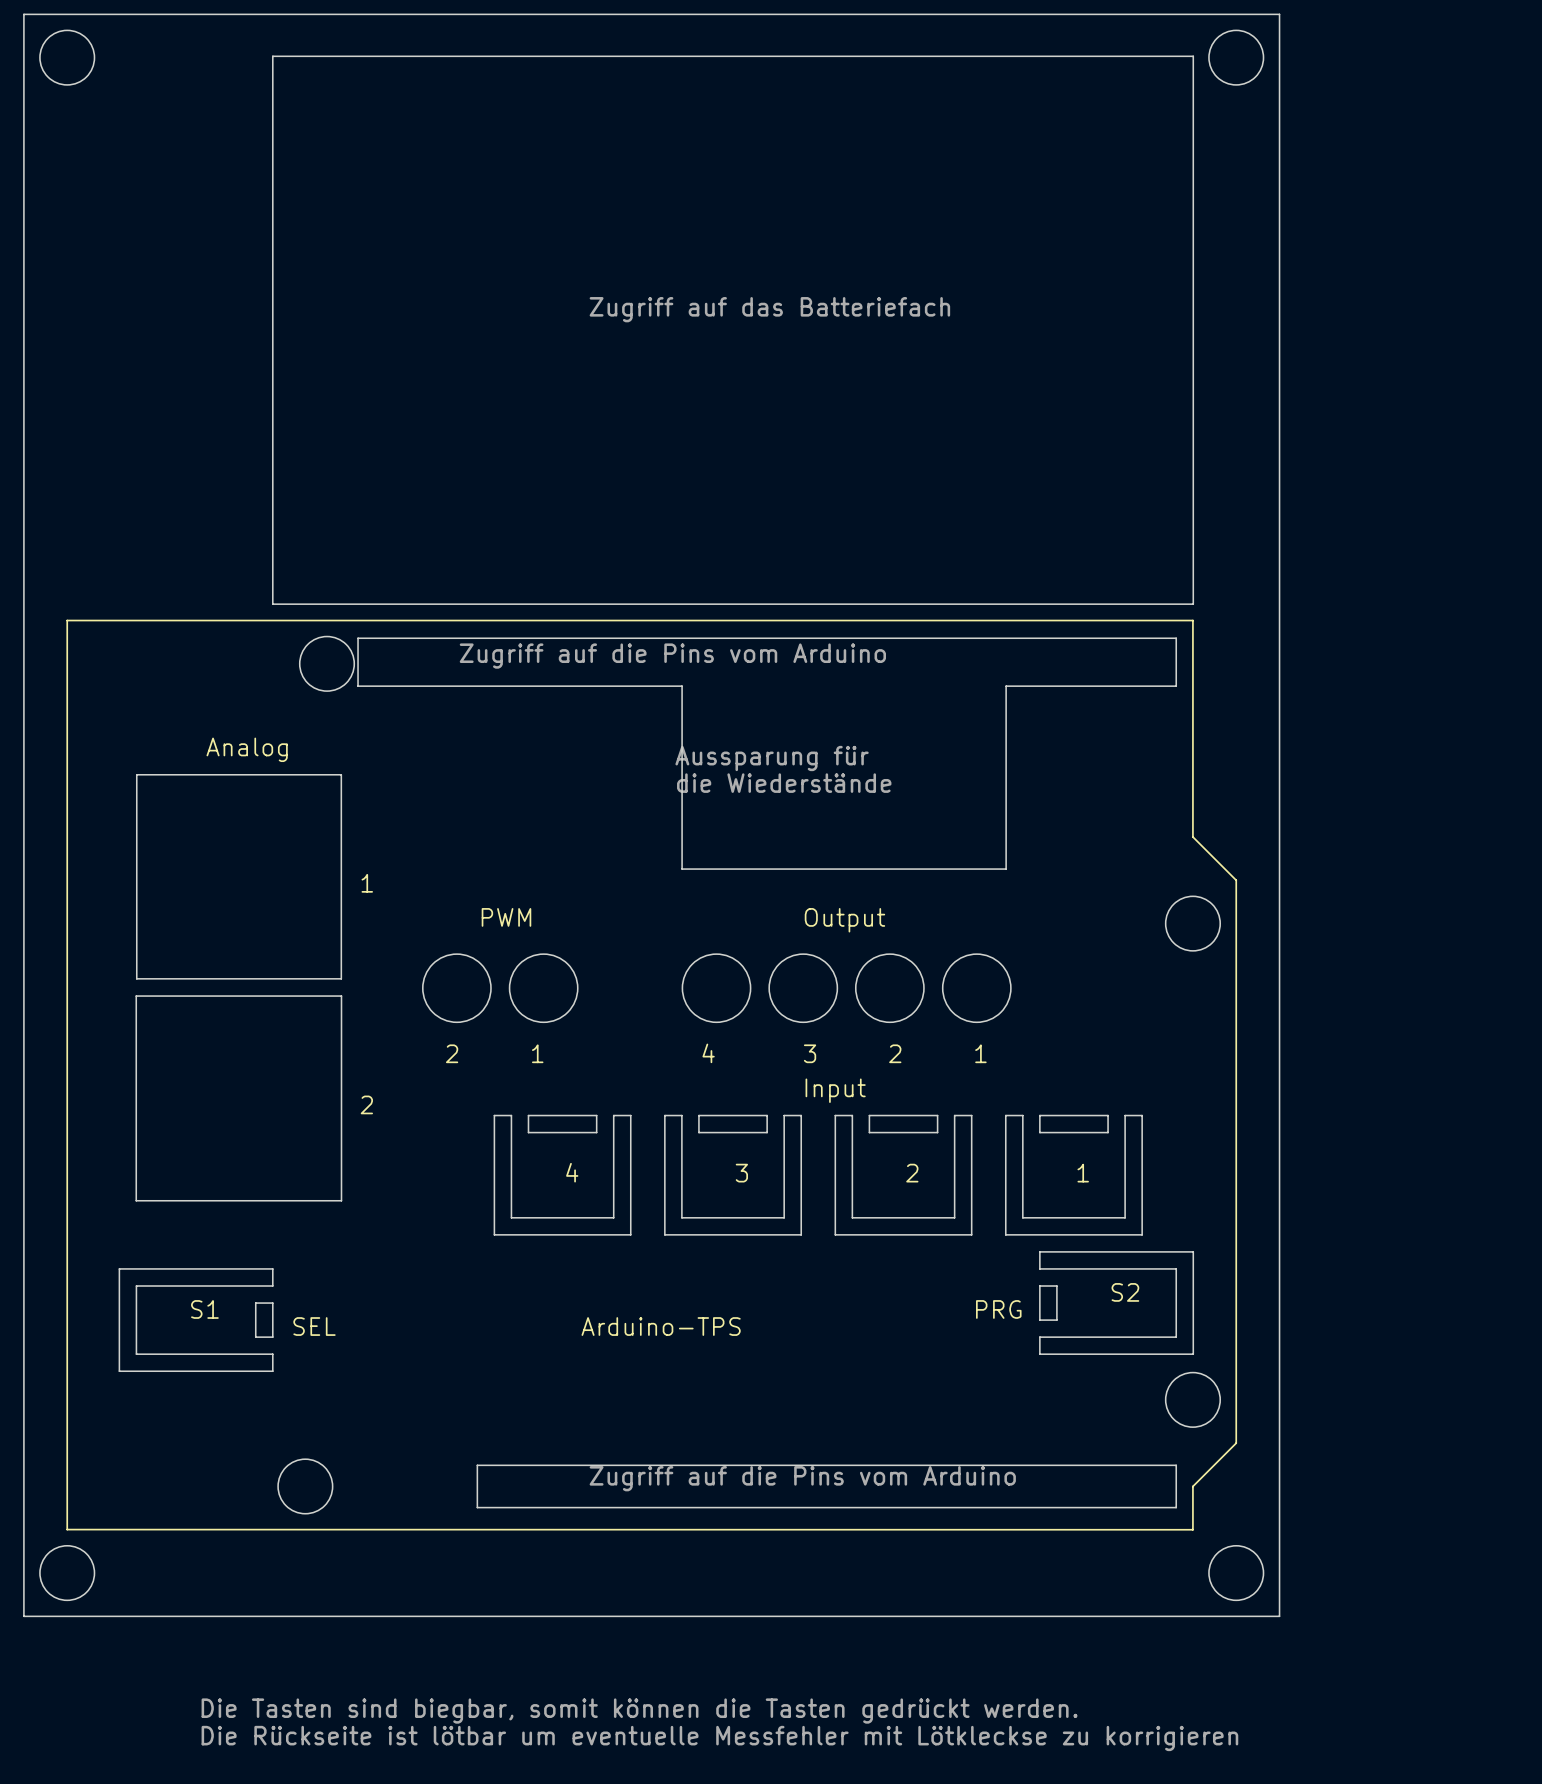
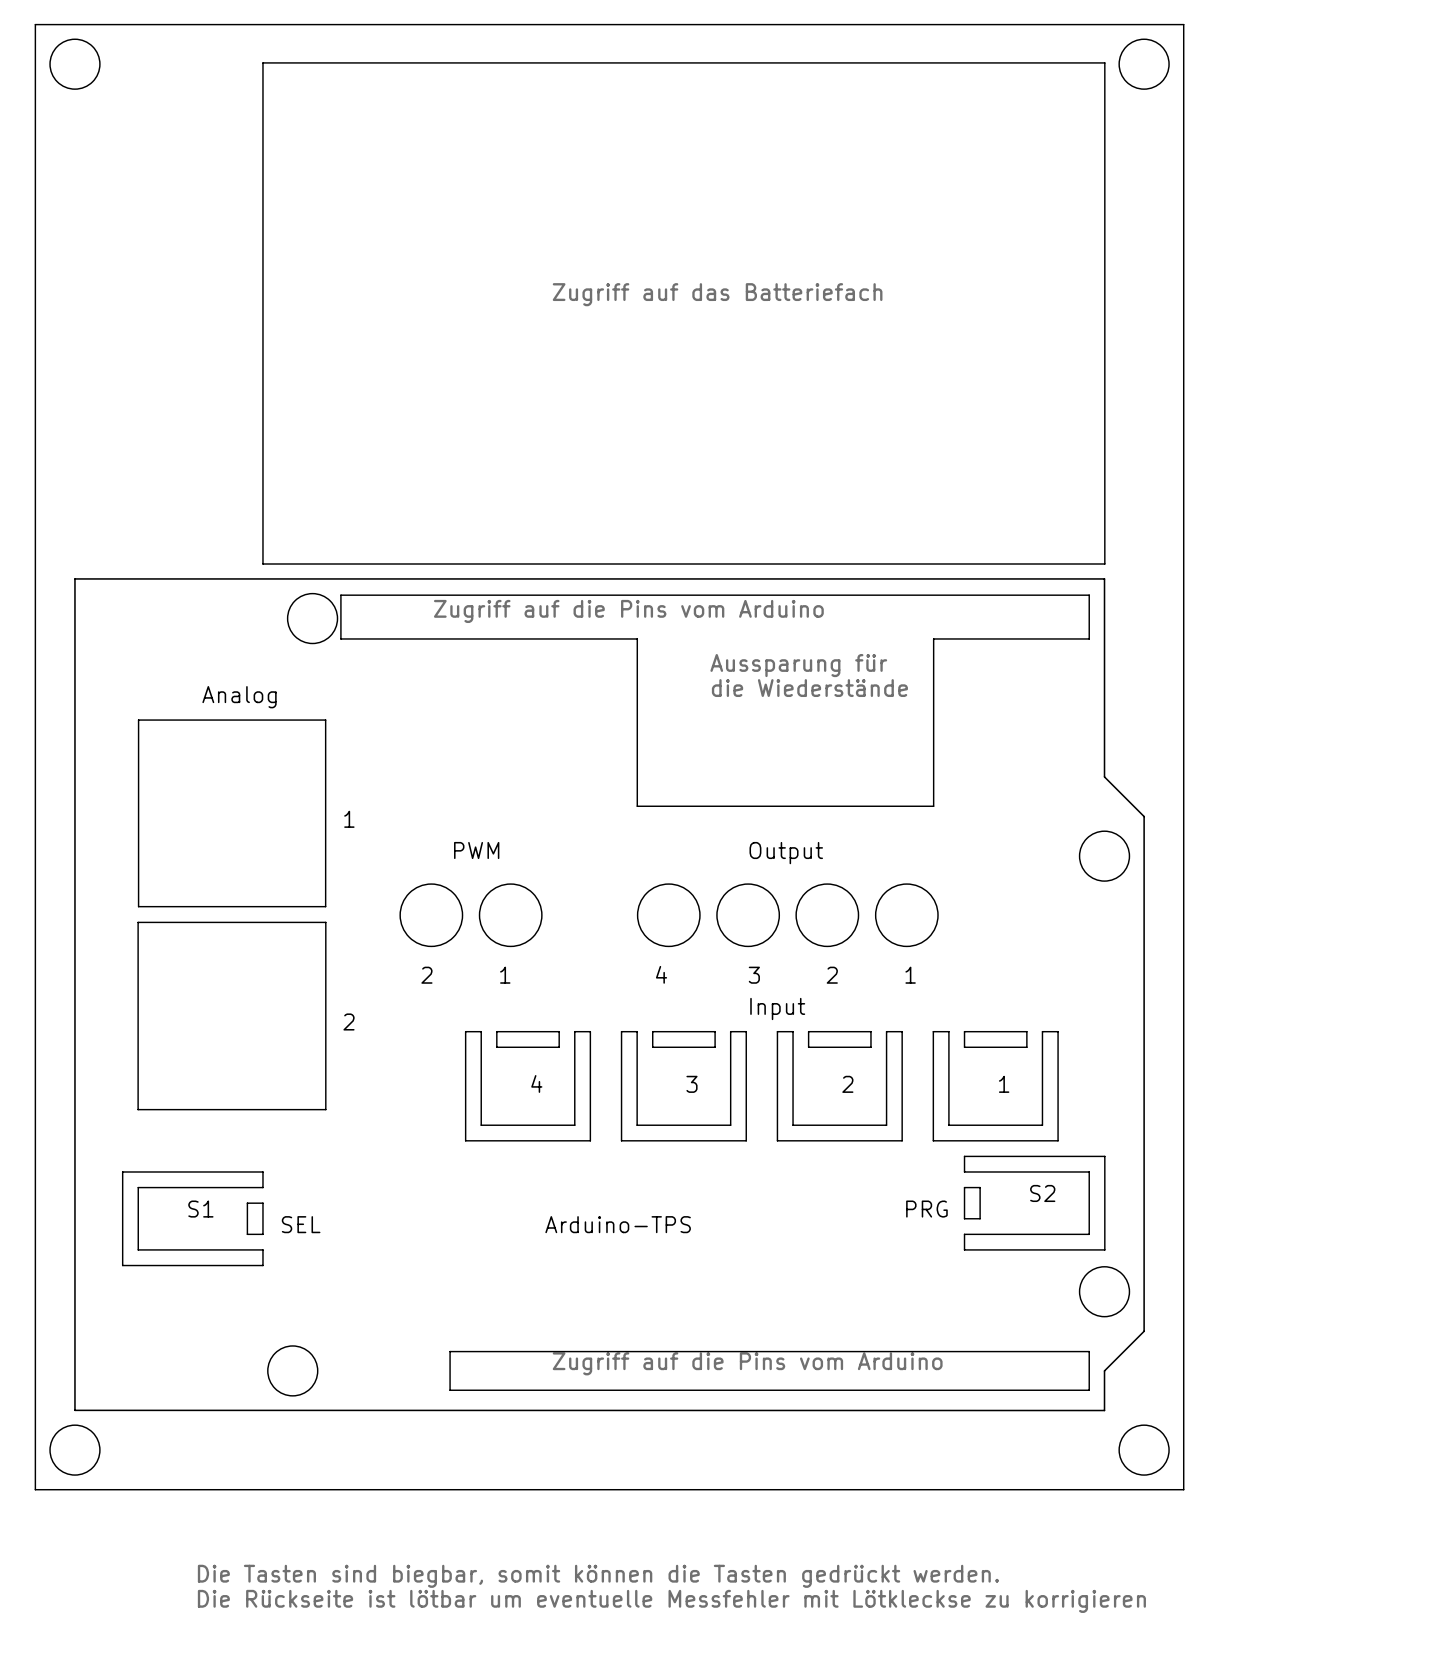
text position: Aussparung für (772, 758) -> Aussparung für (798, 665)
text position: die Wiederstände (784, 783) -> die Wiederstände (809, 688)

